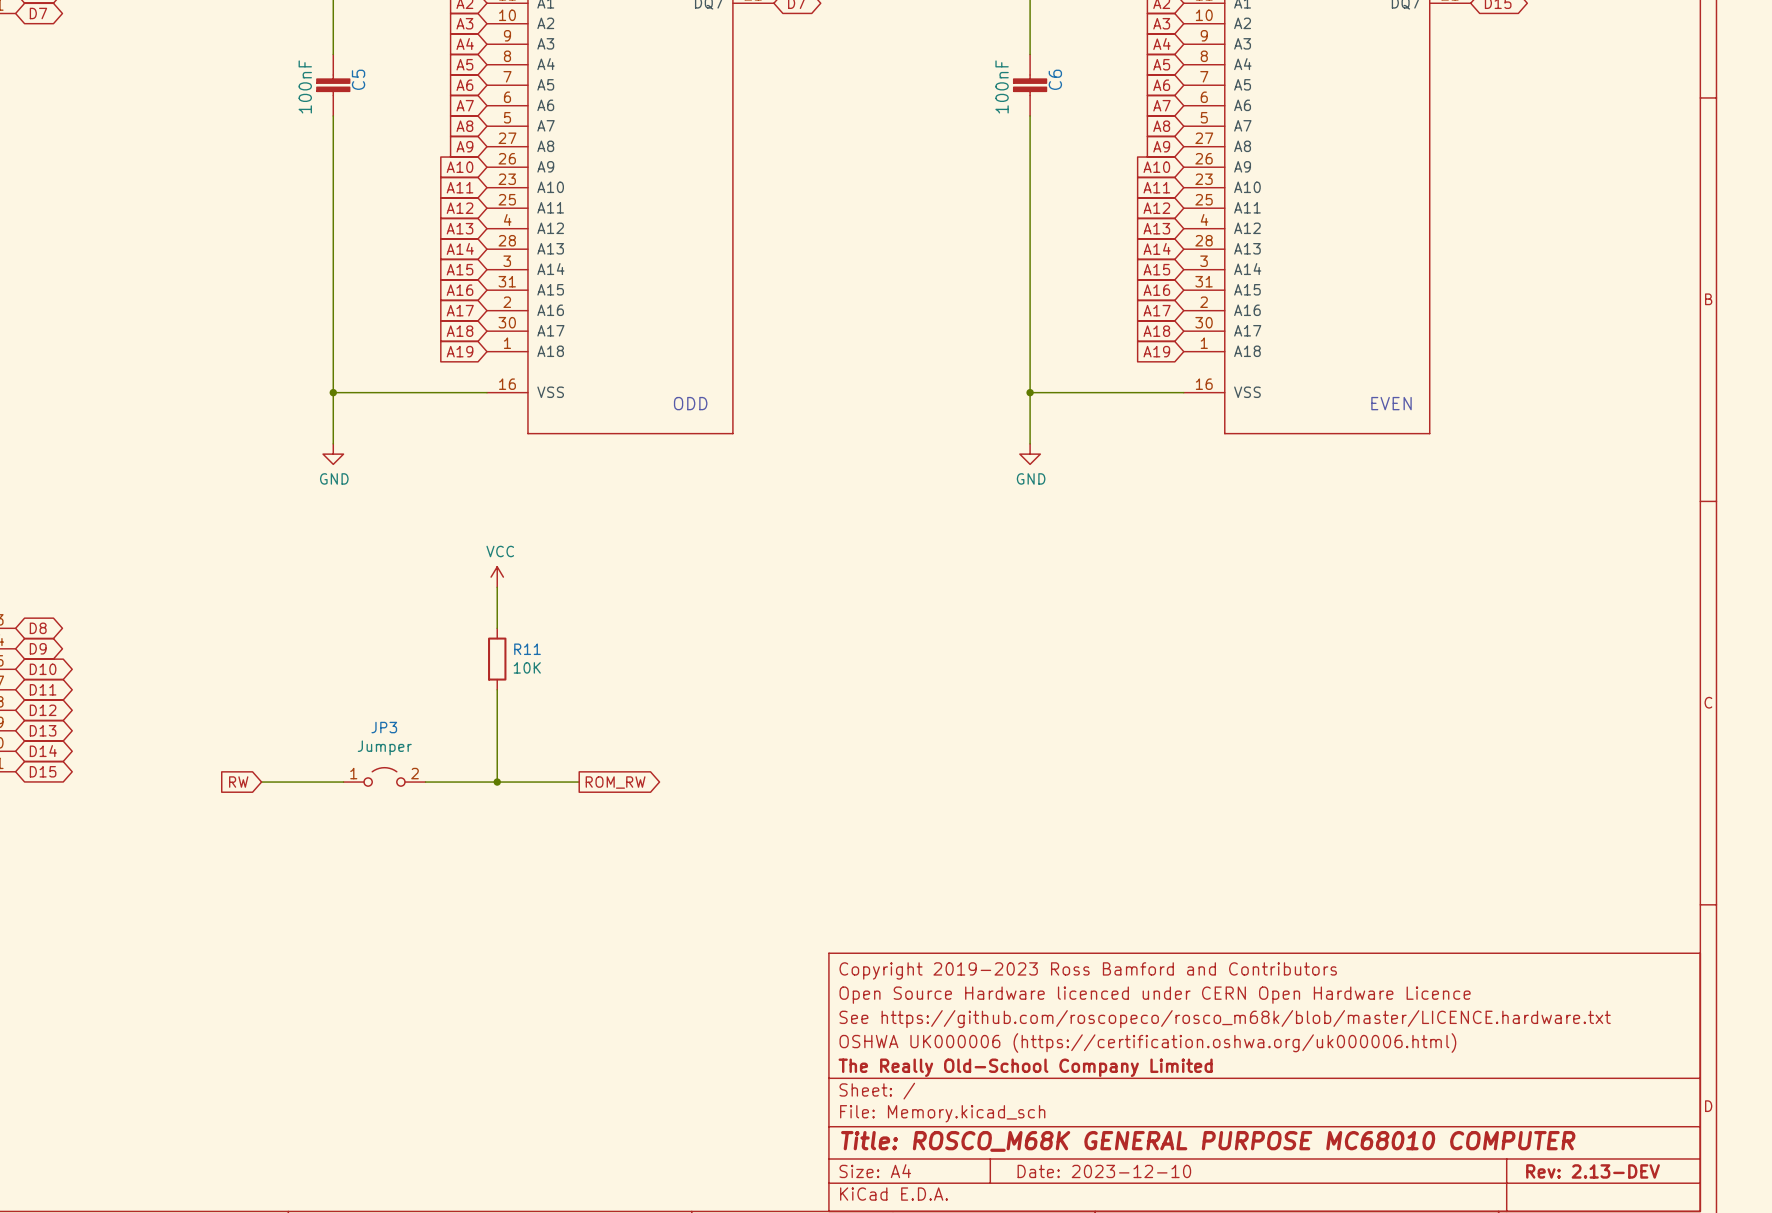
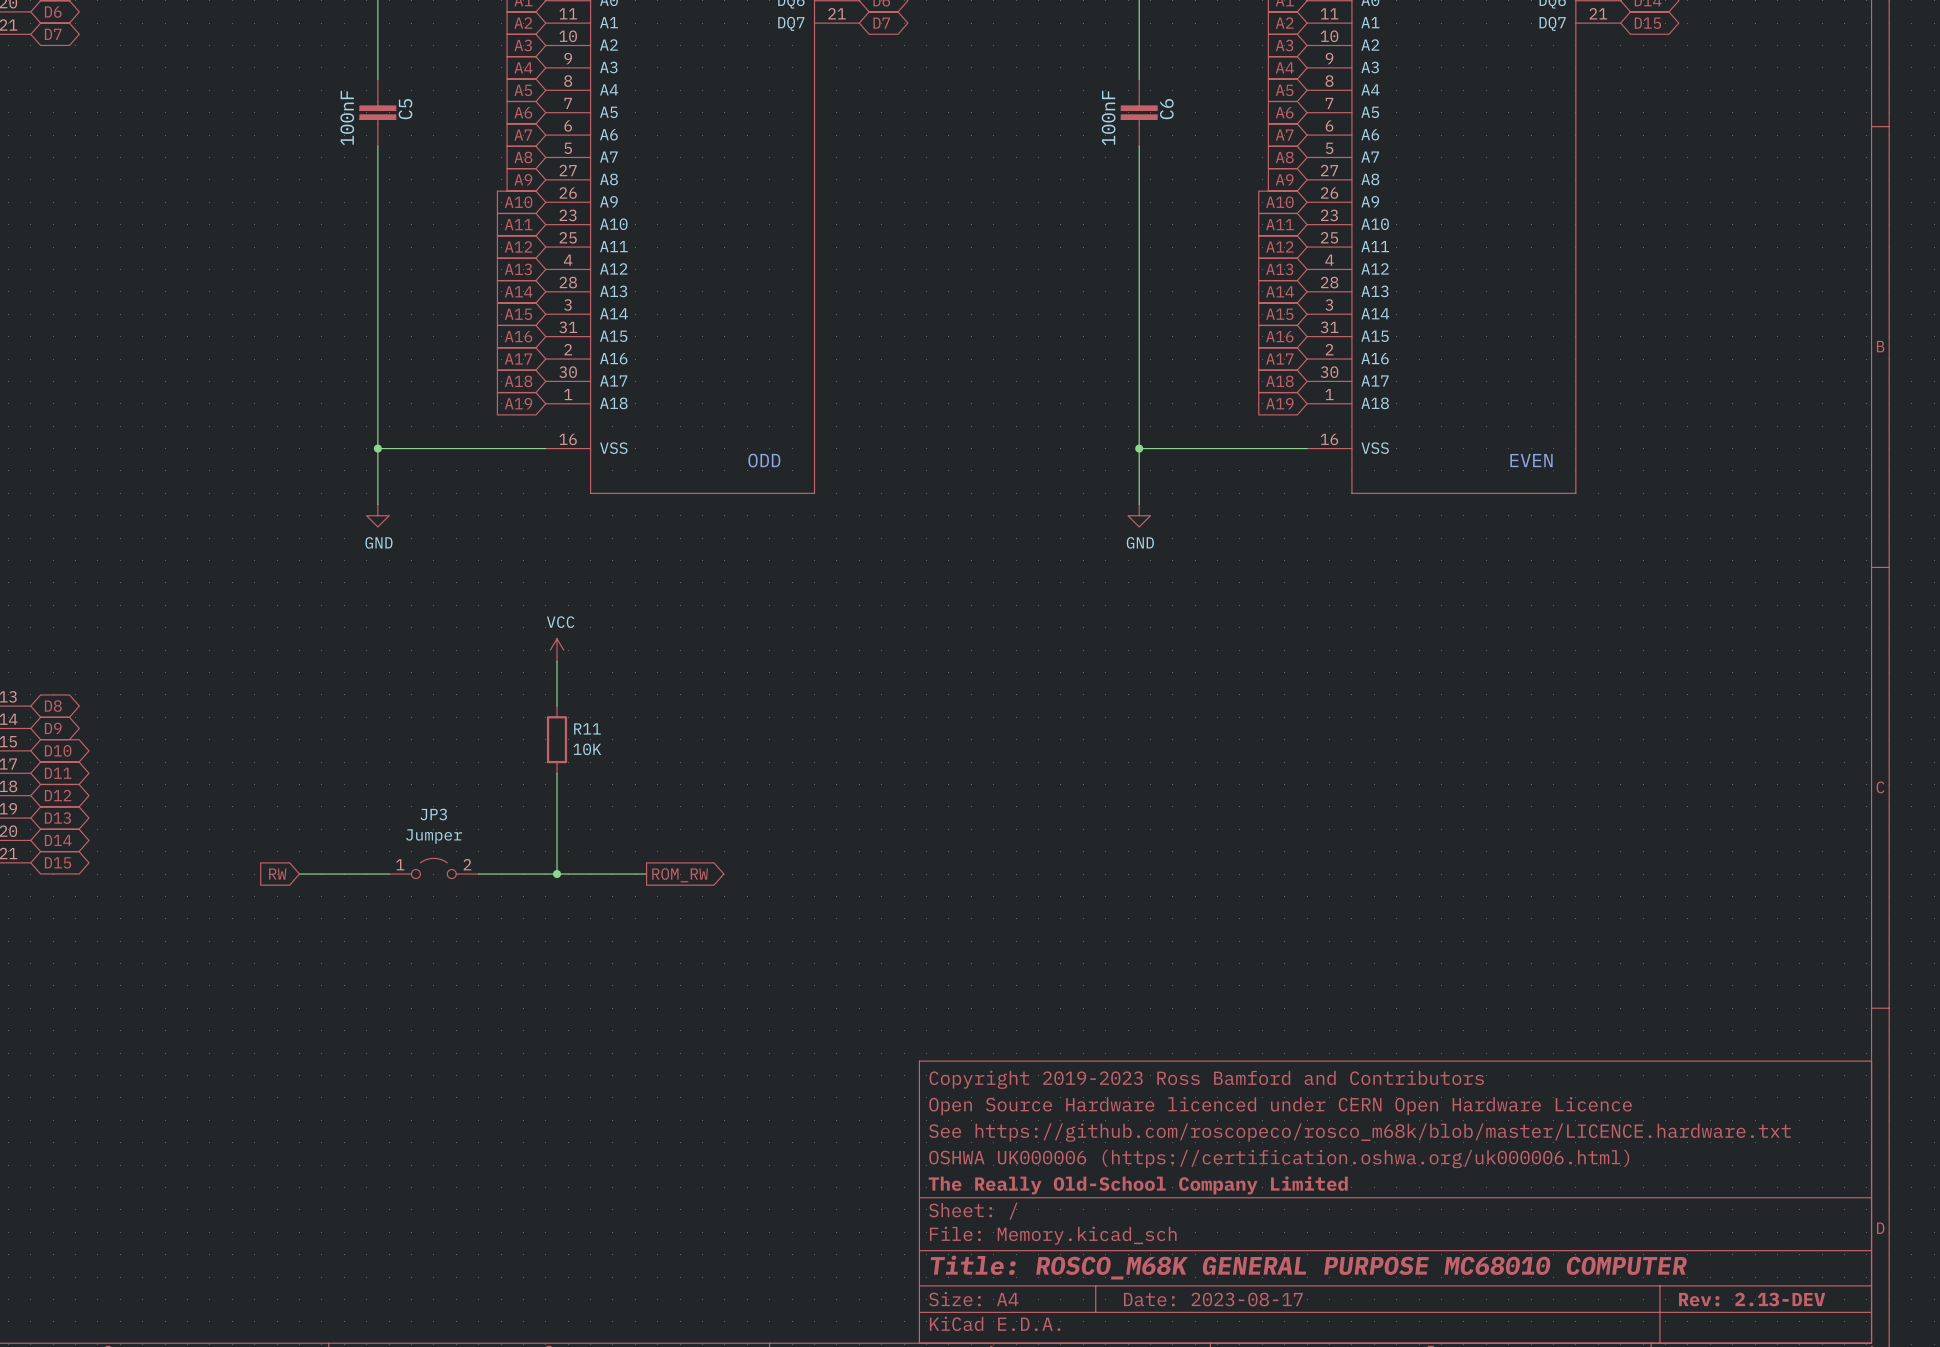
title block: Date: 2023-12-10 (1104, 1171) -> Date: 2023-08-17 (1213, 1299)

